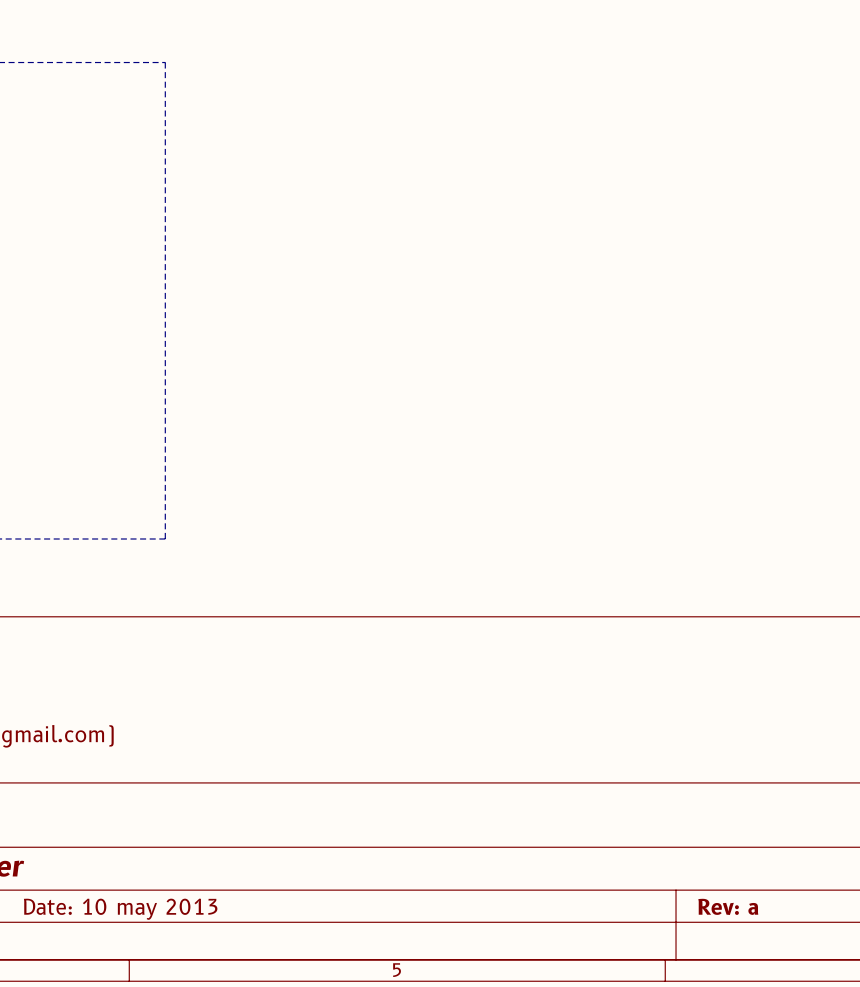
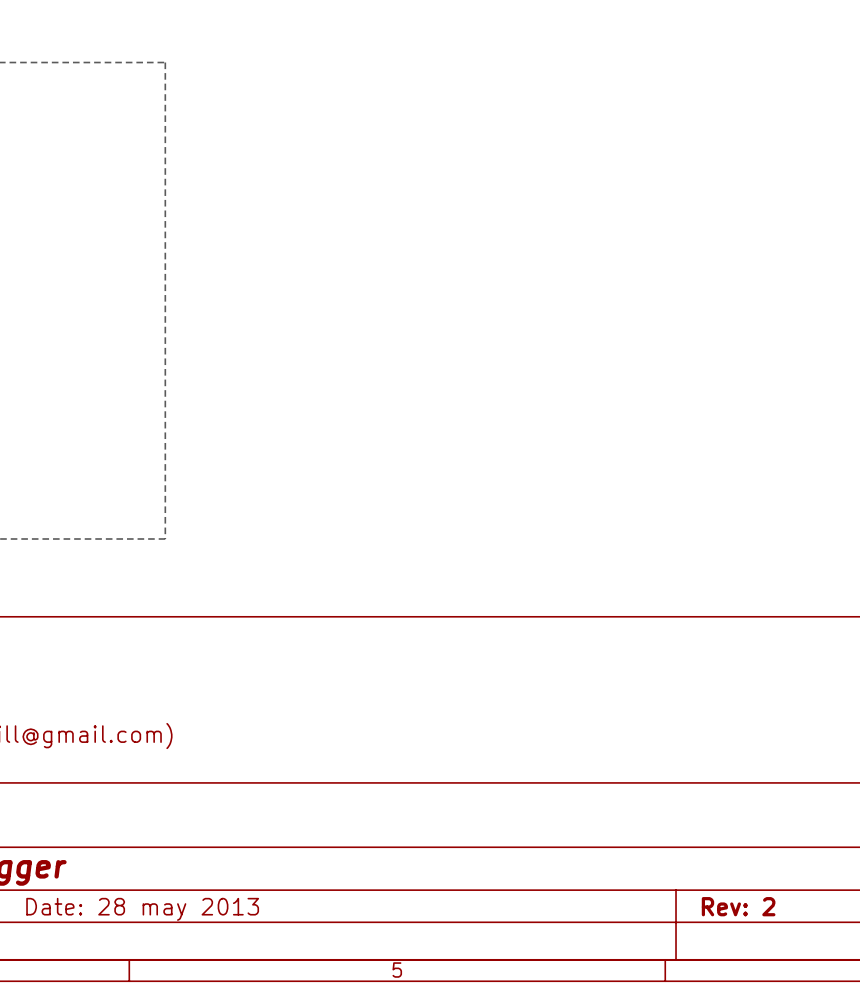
title block: Rev: a (728, 906) -> Rev: 2 (738, 906)
title block: Date: 10 may 2013 (120, 909) -> Date: 28 may 2013 (142, 909)

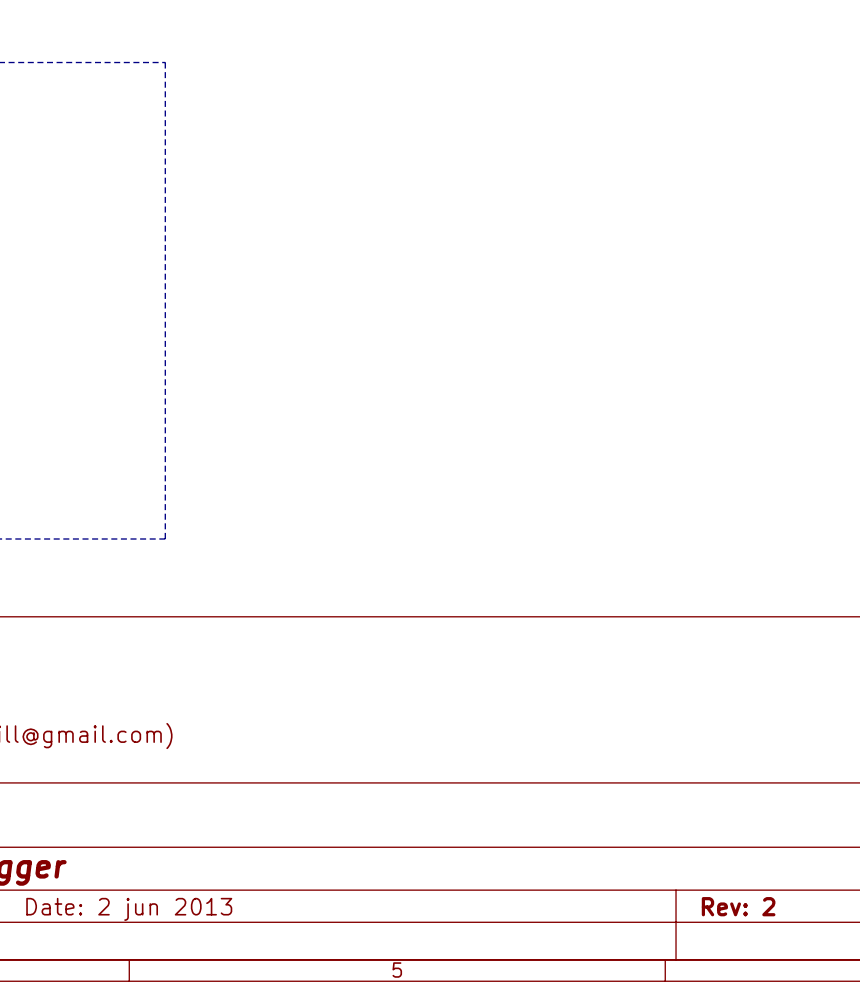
title block: Date: 28 may 2013 (142, 909) -> Date: 2 jun 2013 (129, 909)

